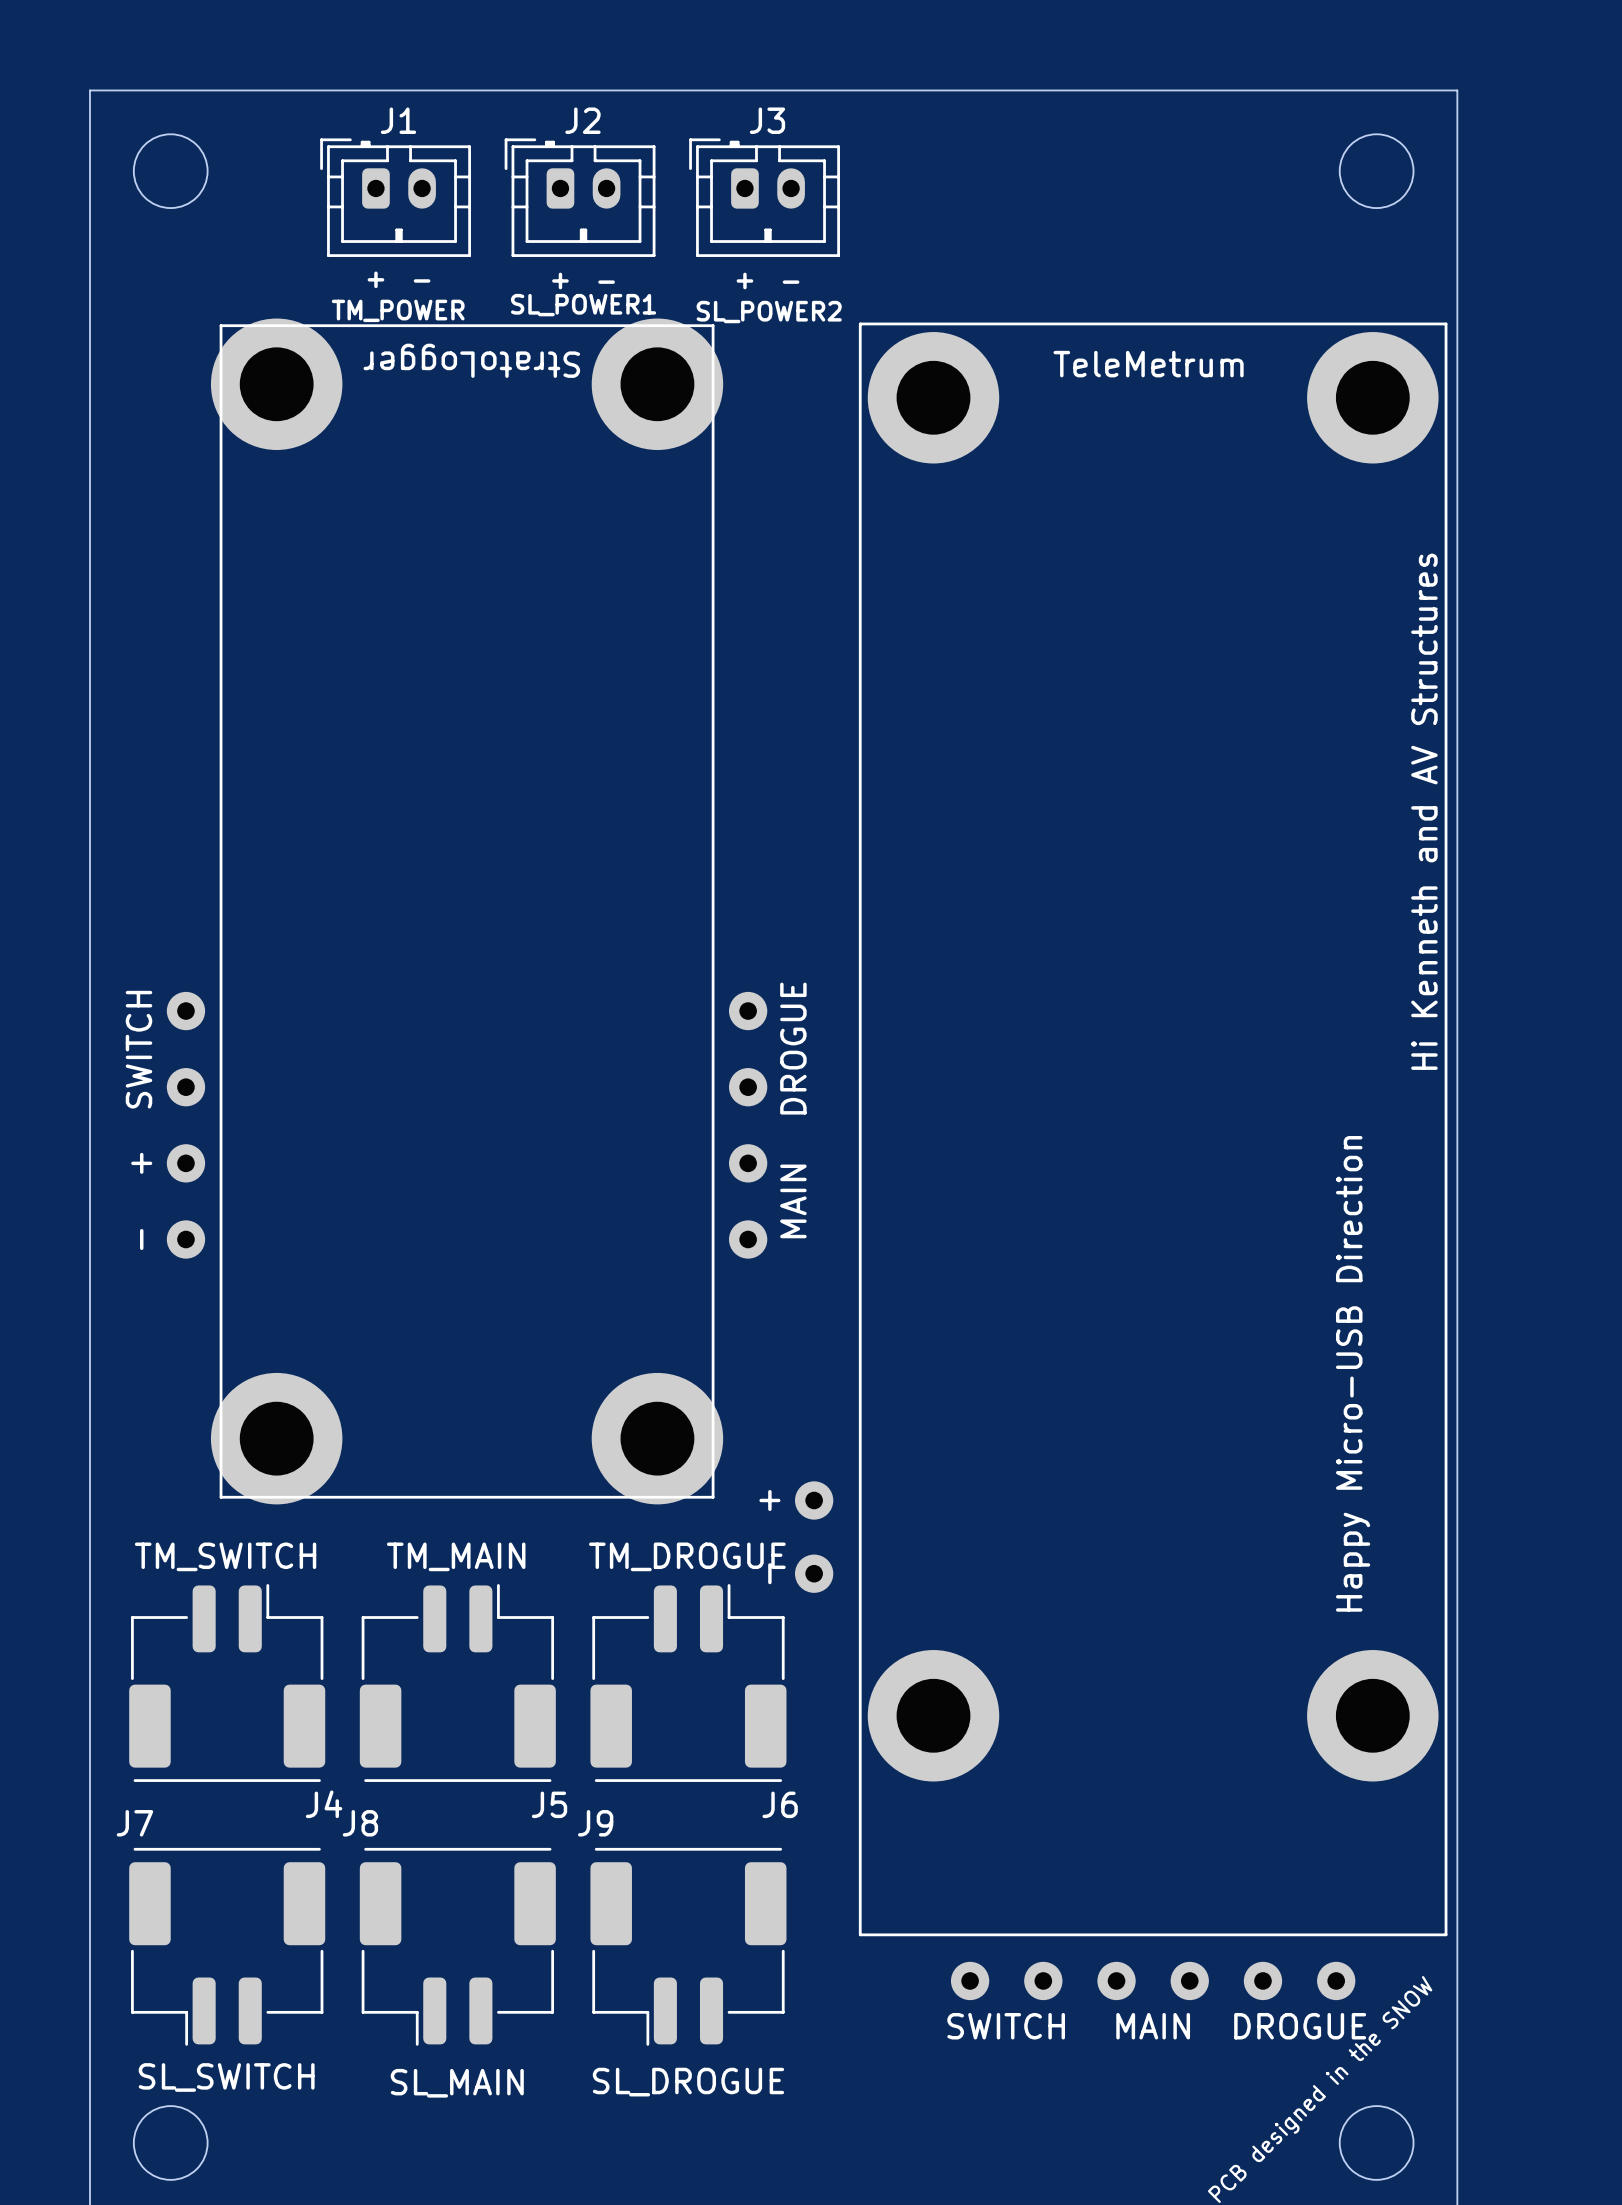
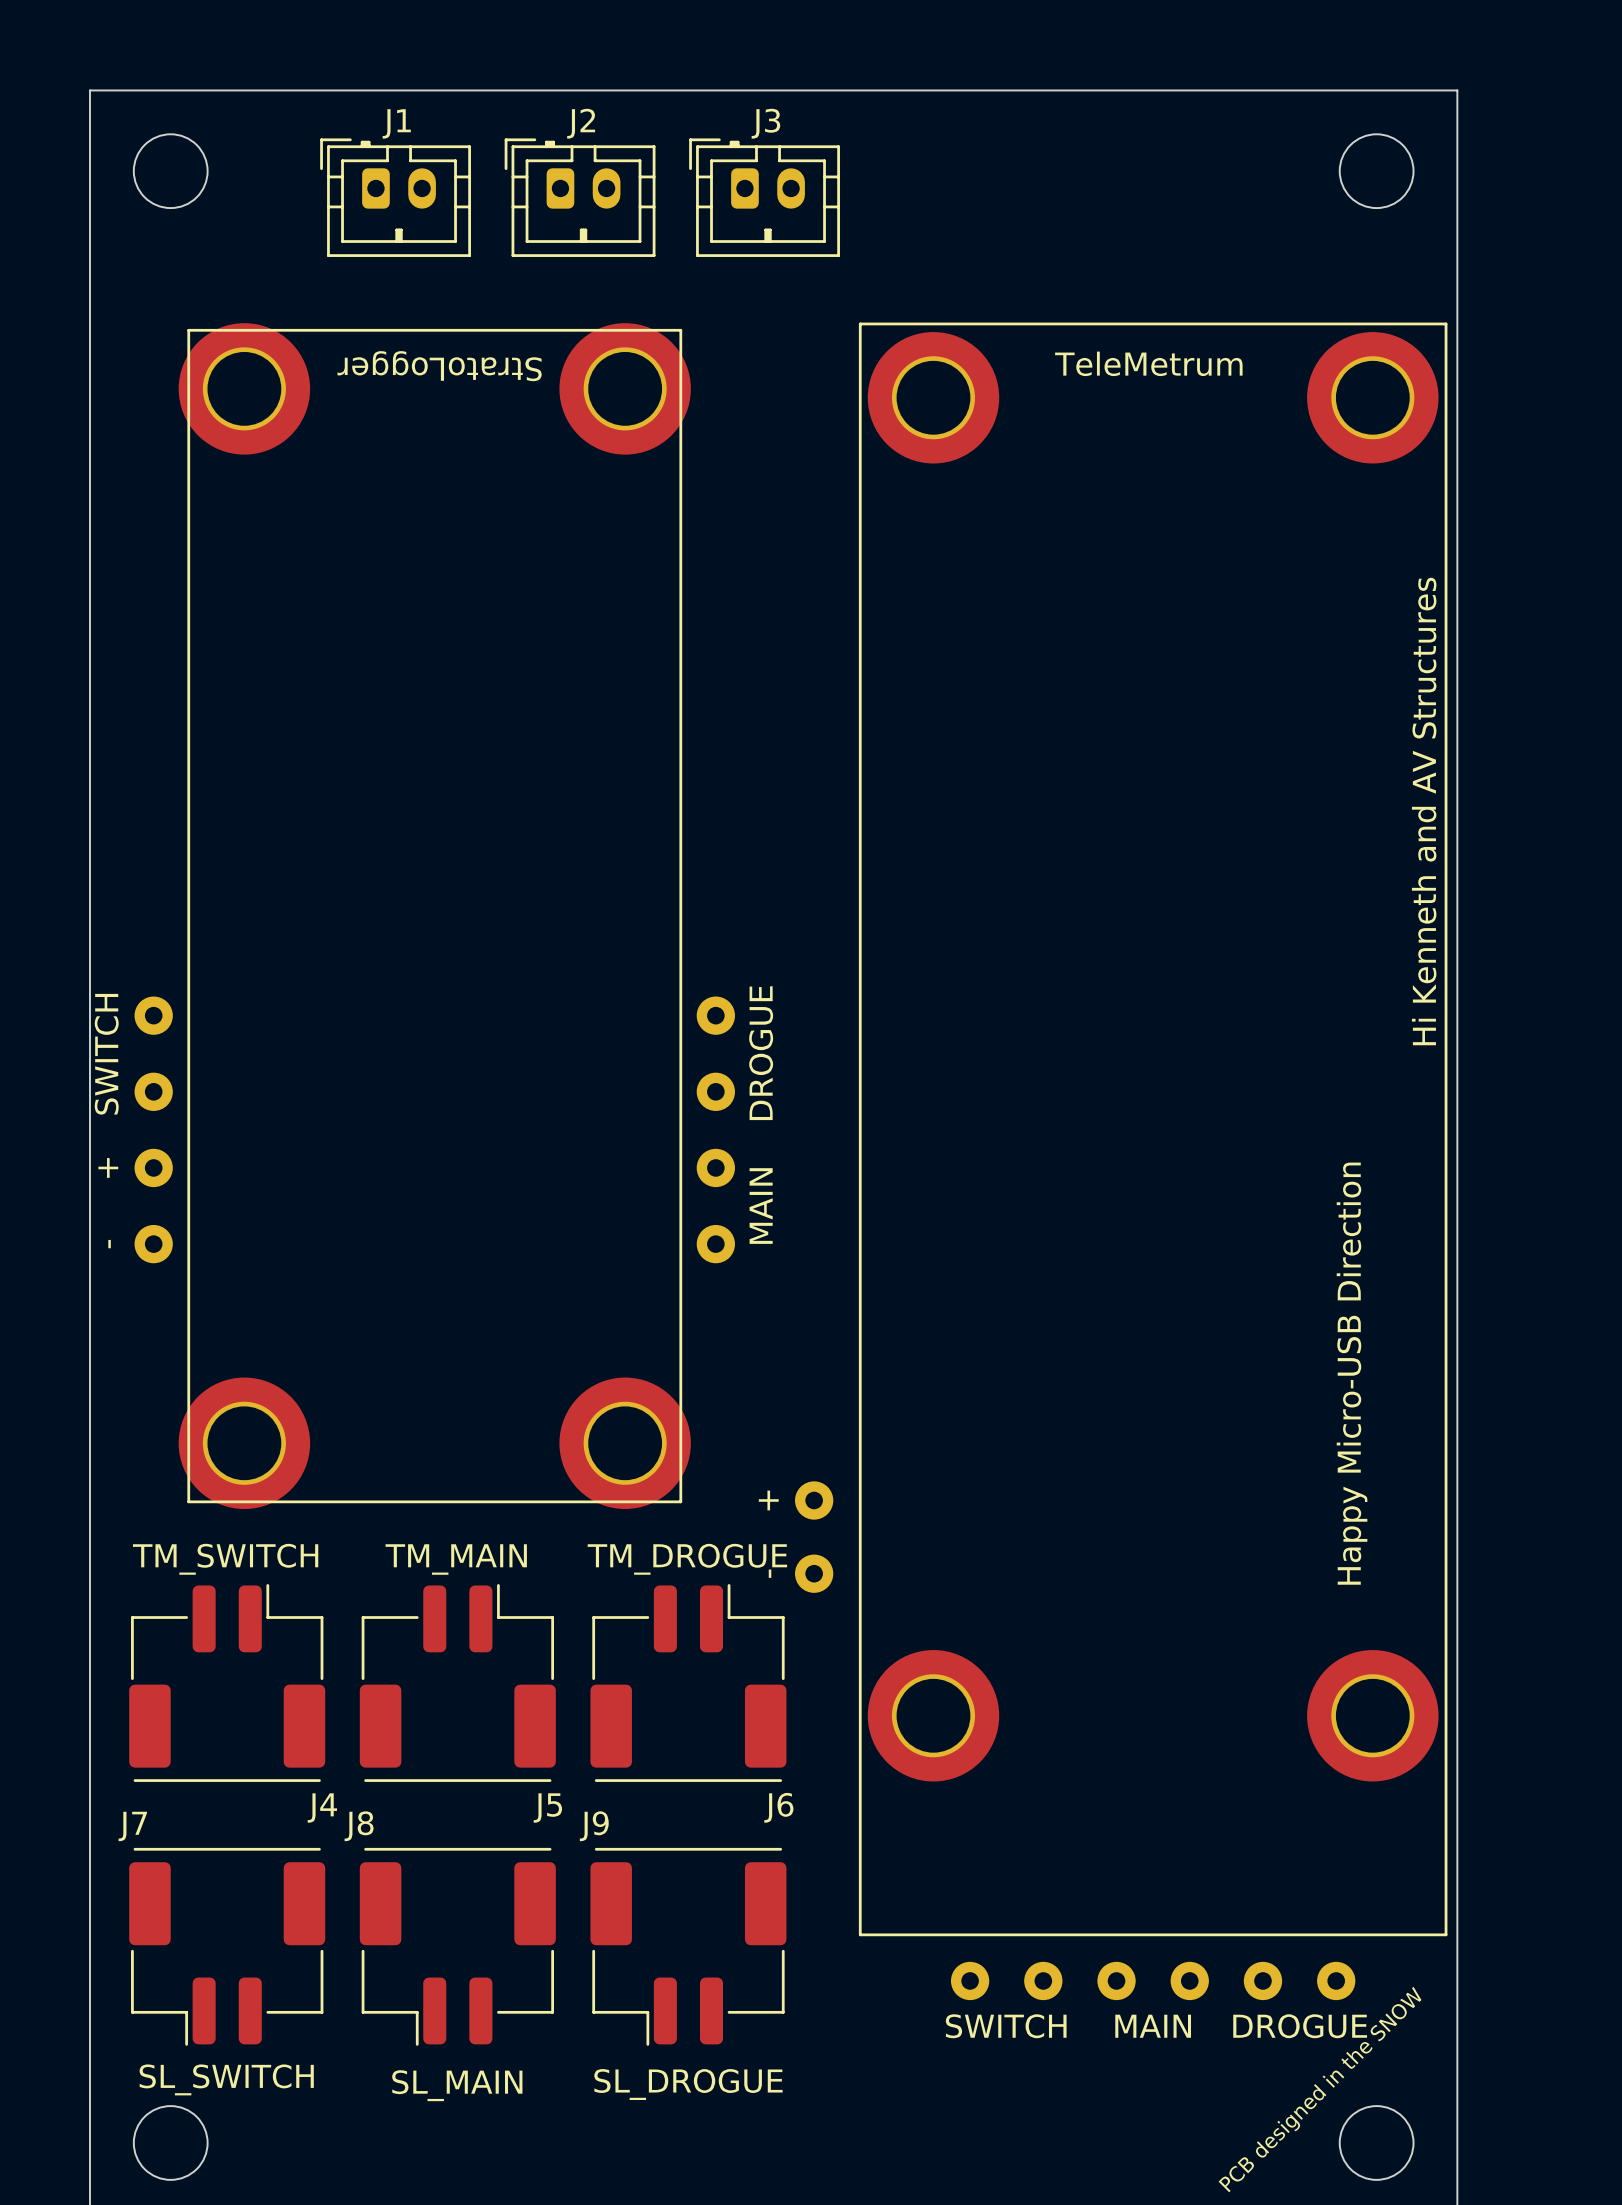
text: + (375, 279) -> none
text: - (422, 280) -> none
text: + (560, 280) -> none
text: + (744, 280) -> none
text: - (606, 282) -> none
text: - (791, 282) -> none
text: SL_POWER1 (583, 305) -> none
text: TM_POWER (398, 310) -> none
text: SL_POWER2 (769, 312) -> none
part position: (467, 911) -> (434, 916)

